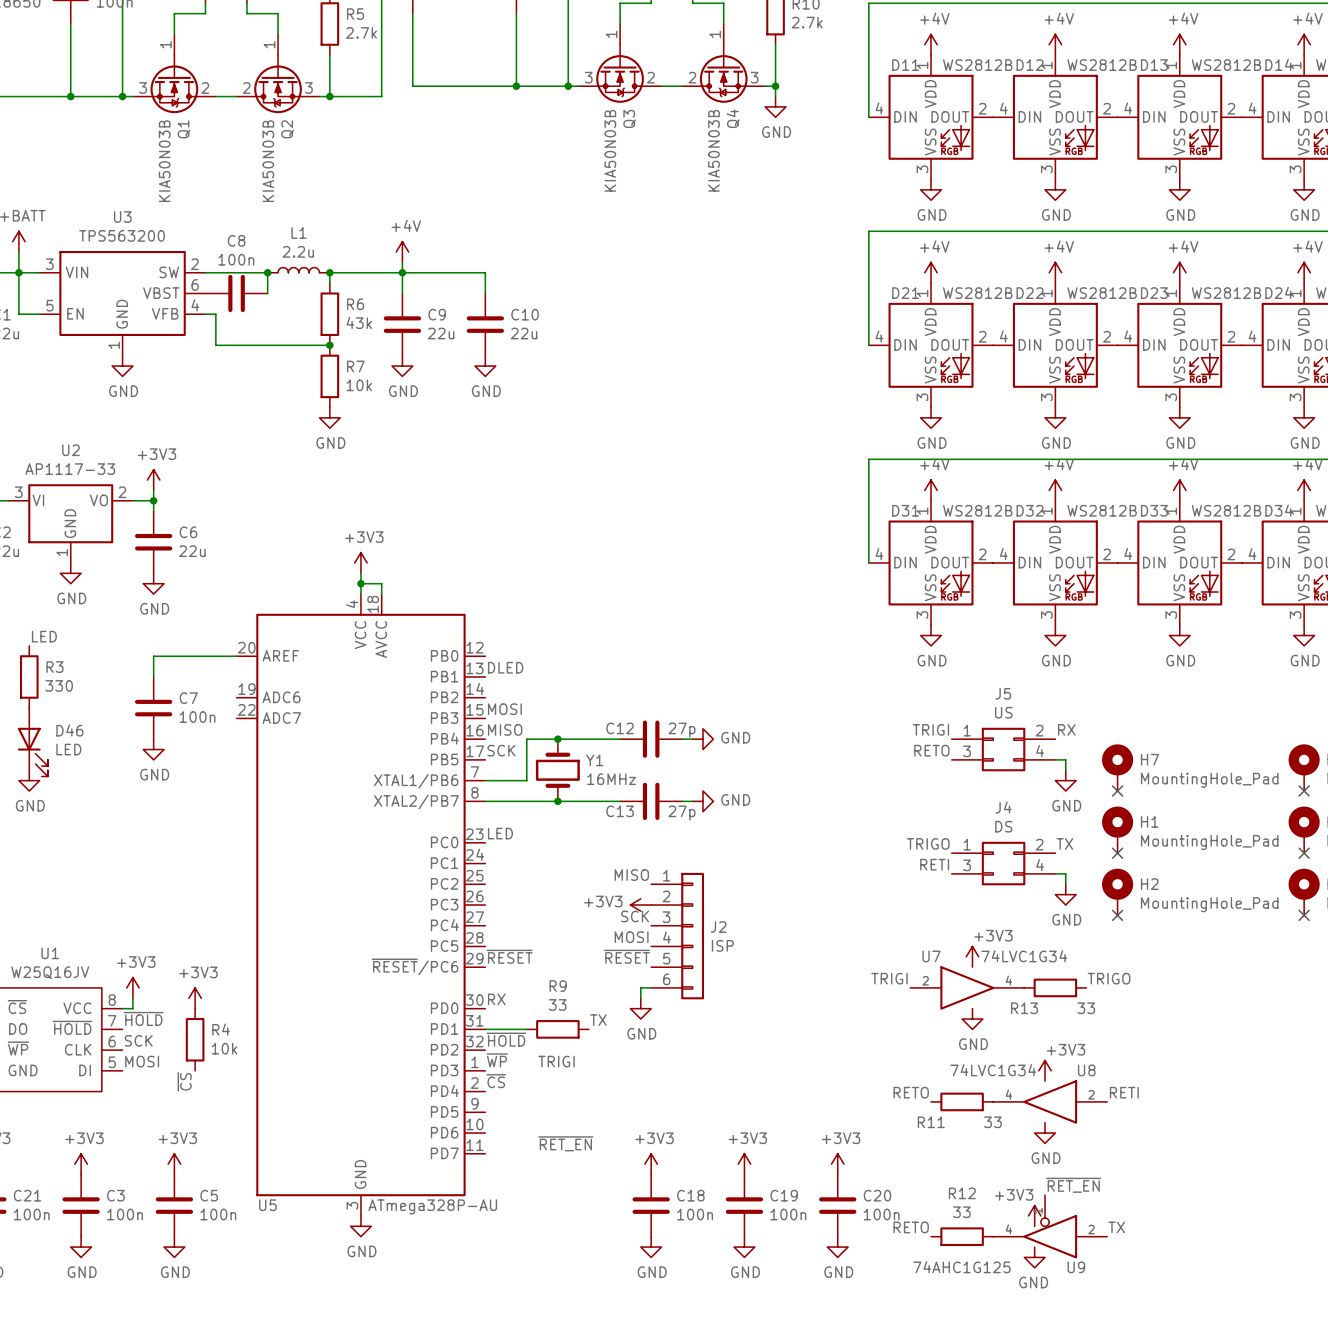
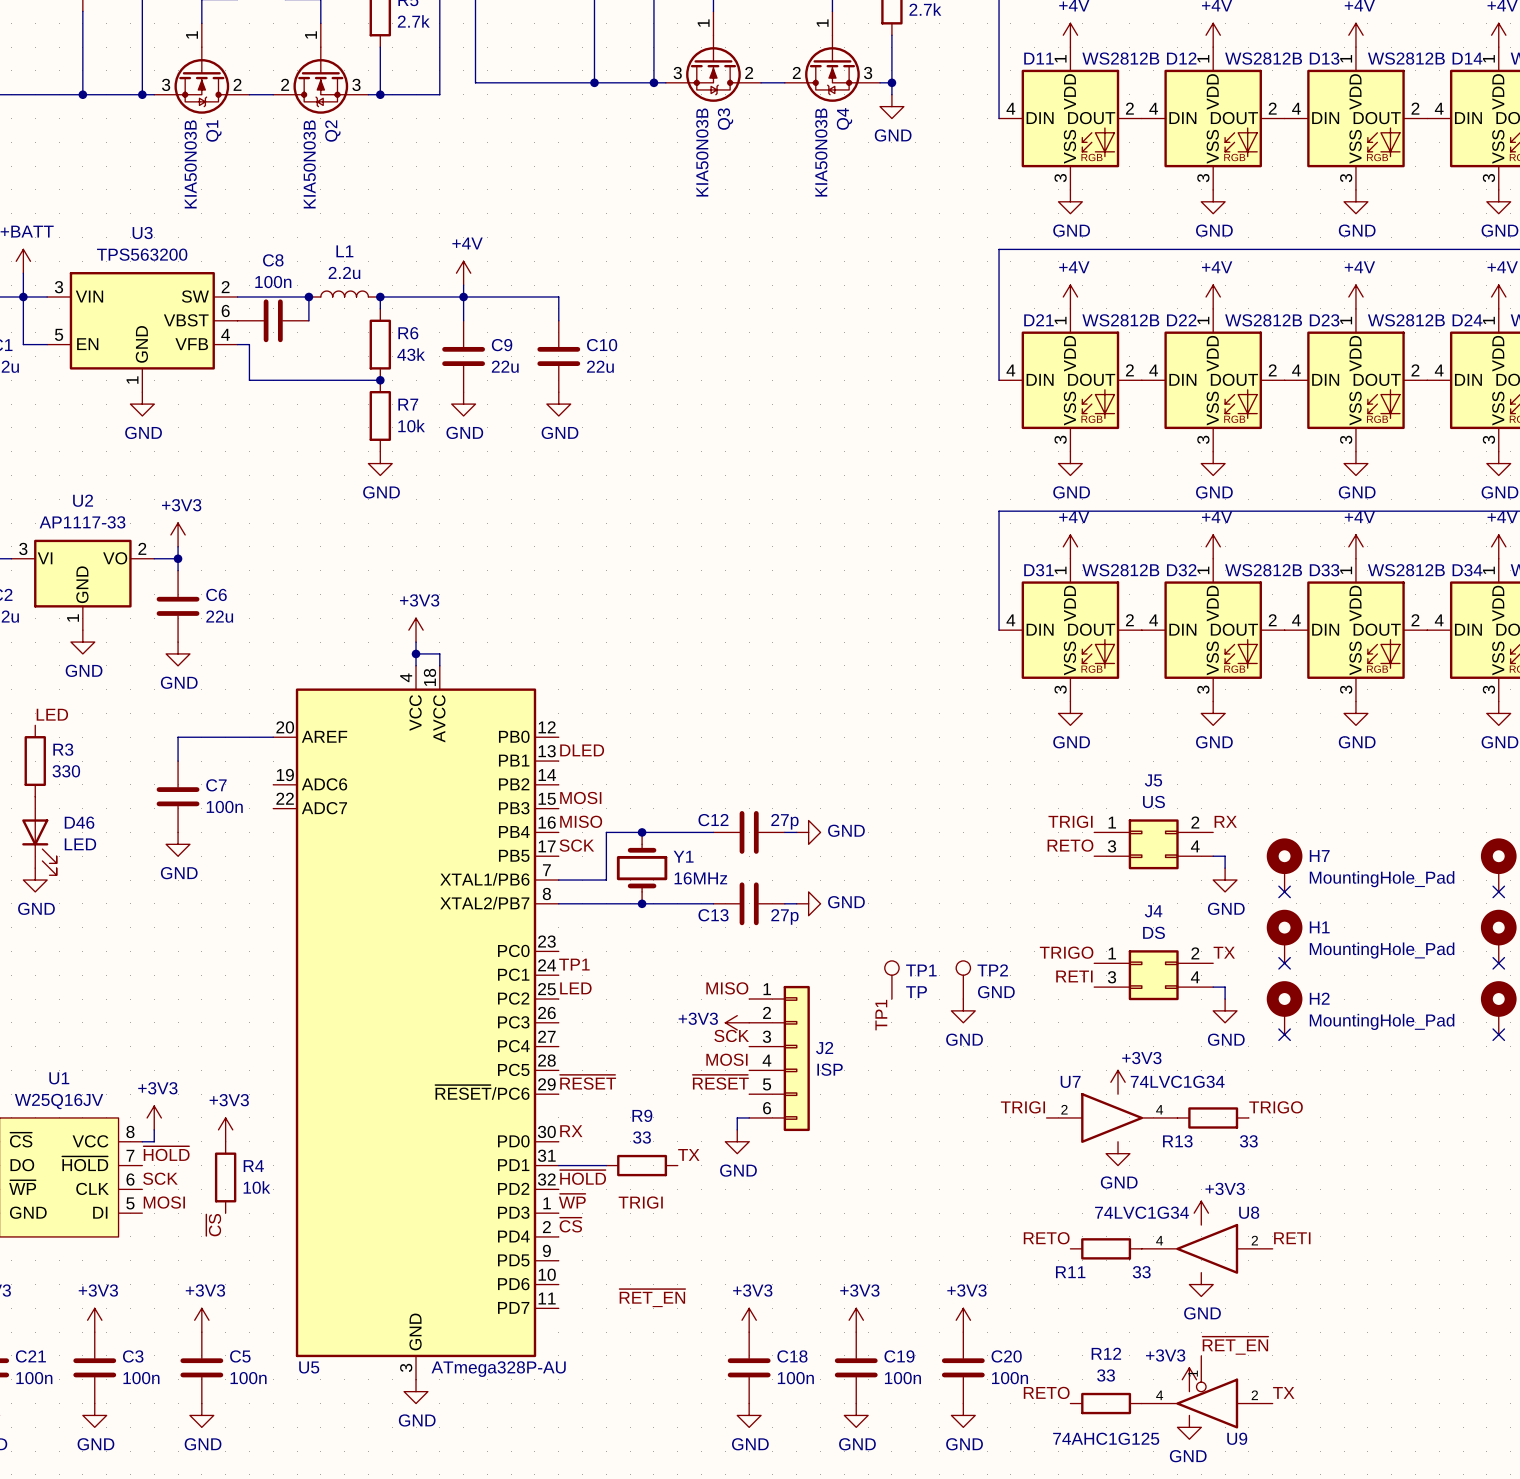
label position: LED (500, 833) -> LED (575, 988)
label: none -> TP1 (574, 964)
TP1: none -> TP (891, 979)
TP2: none -> GND (963, 979)
power symbol: none -> GND (963, 1010)
label: none -> TP1 (881, 1015)

